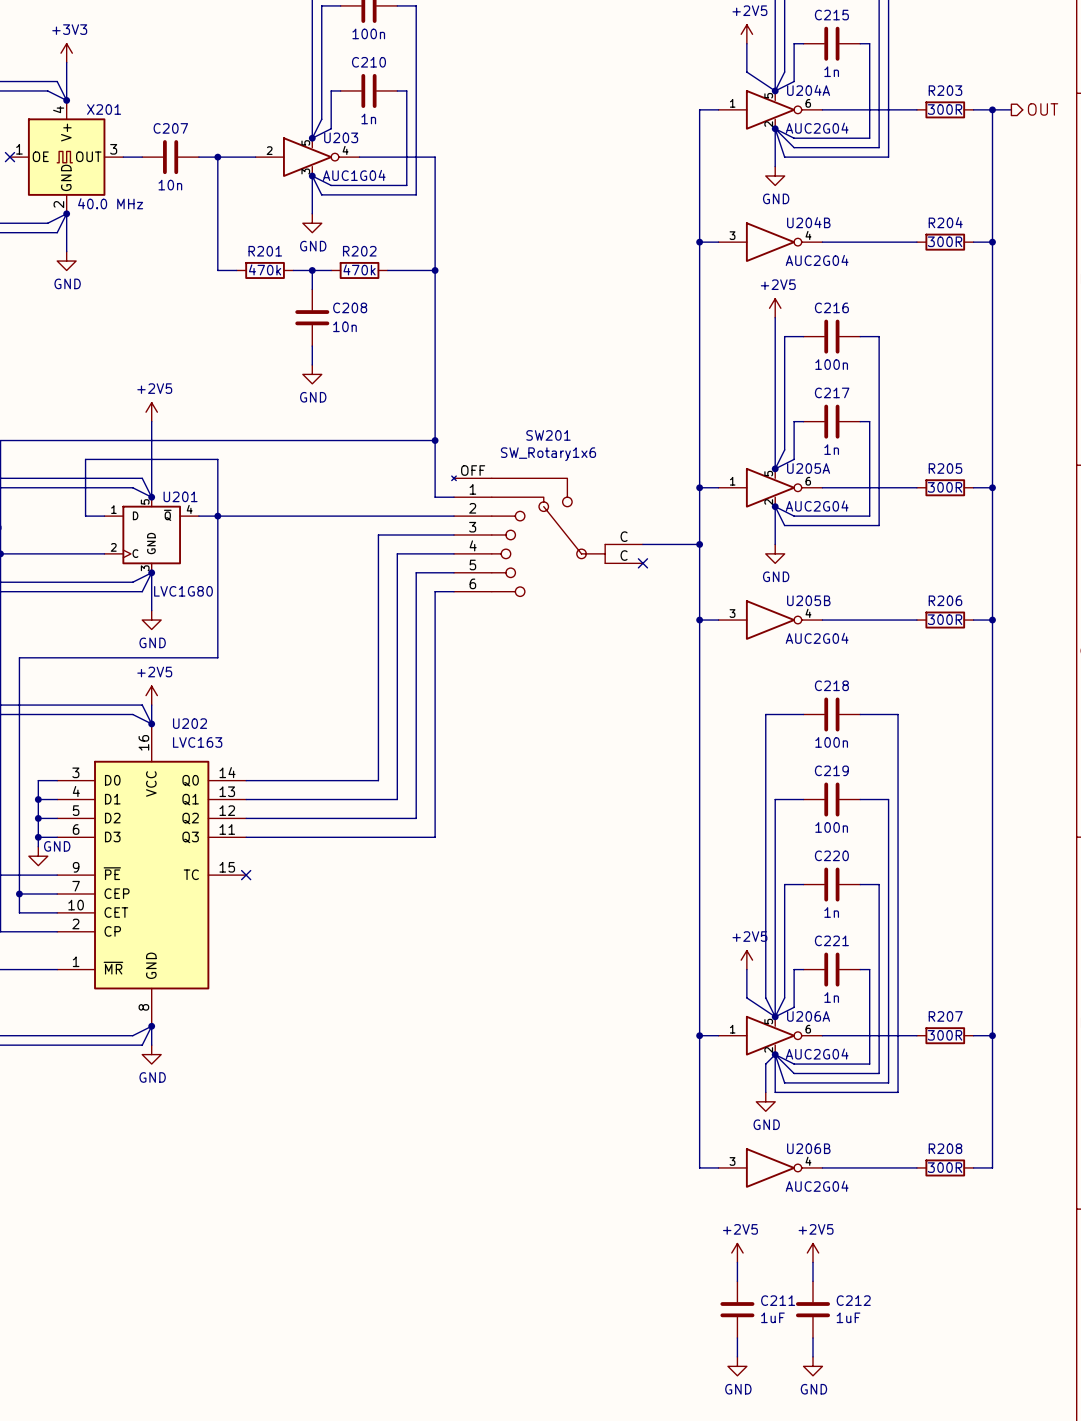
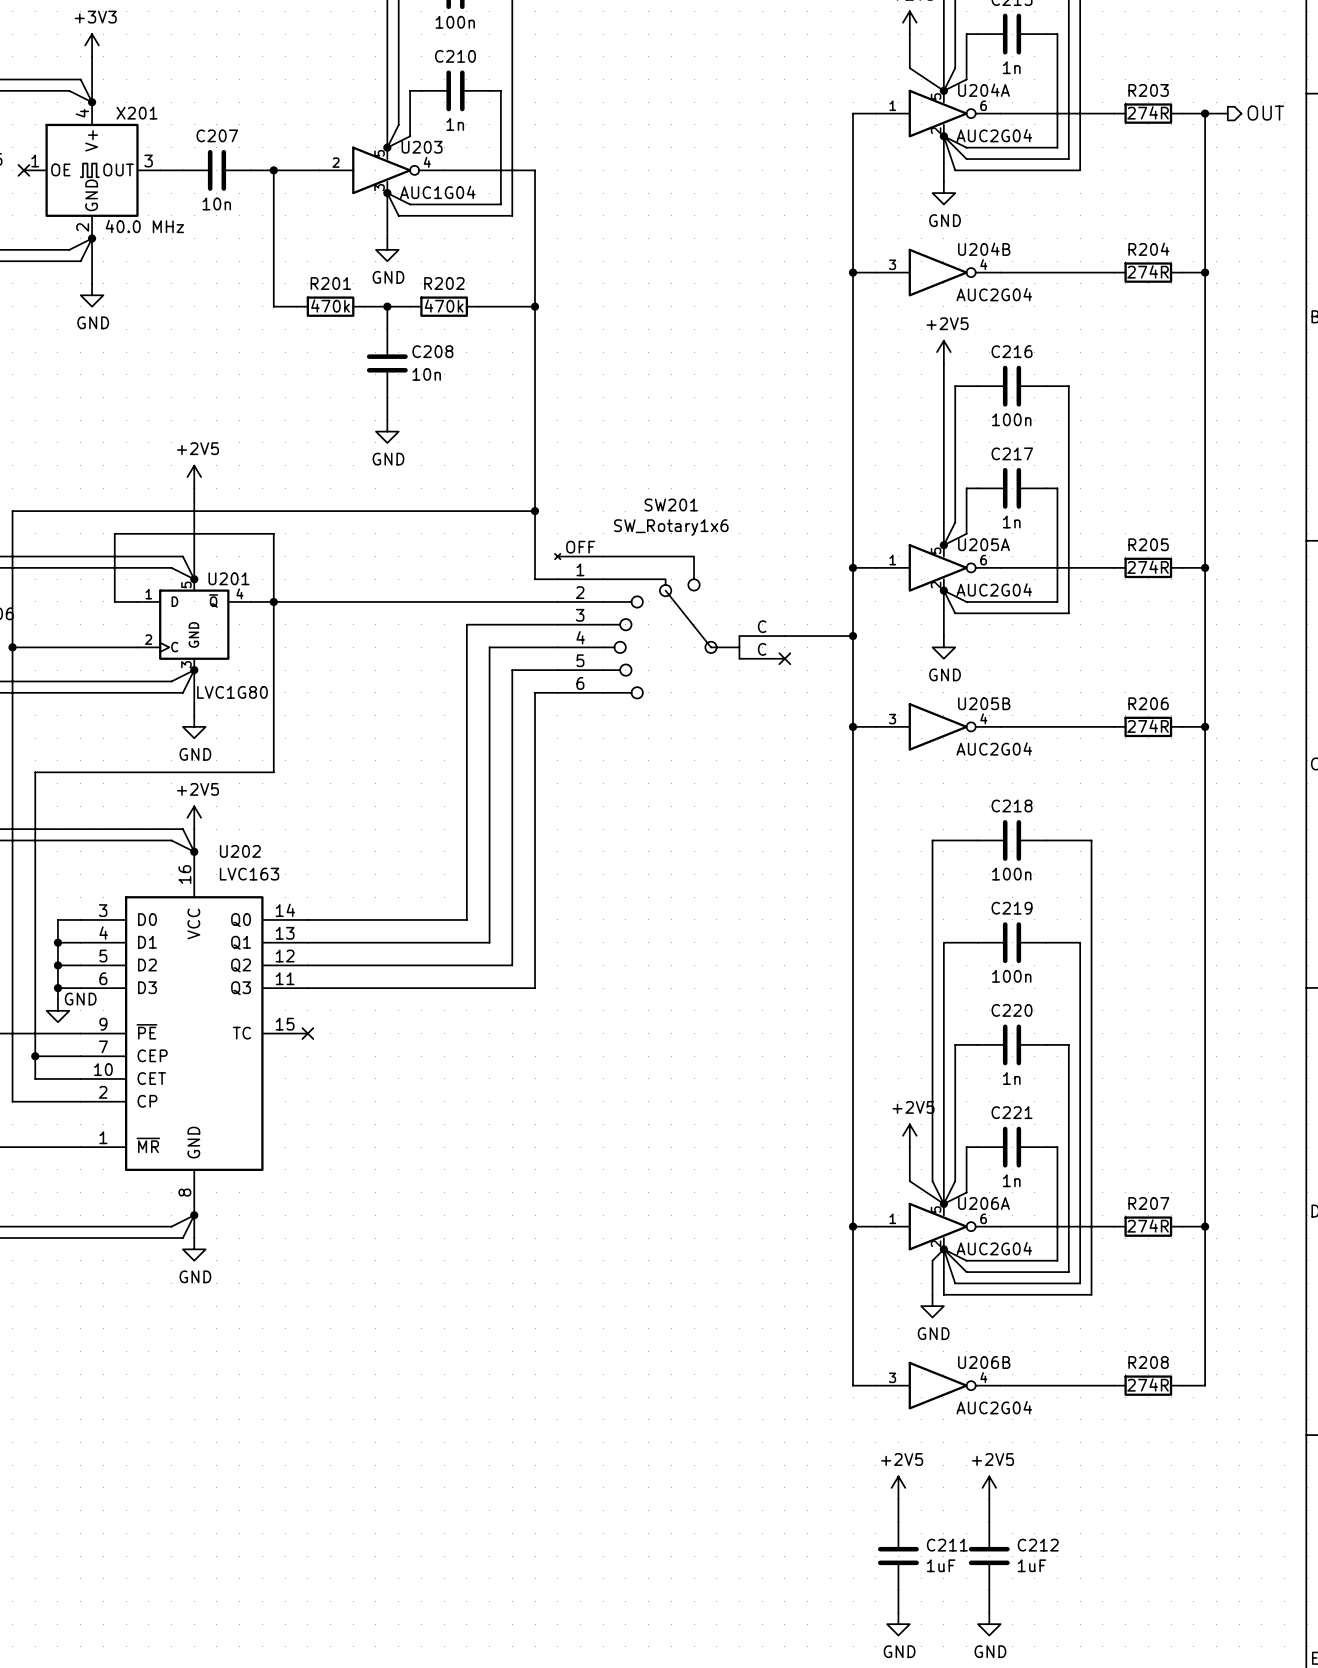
R203 value: 300R (945, 109) -> 274R (1148, 112)
R204 value: 300R (945, 241) -> 274R (1148, 271)
R205 value: 300R (945, 487) -> 274R (1148, 567)
R206 value: 300R (945, 619) -> 274R (1148, 726)
R207 value: 300R (945, 1035) -> 274R (1148, 1225)
R208 value: 300R (945, 1167) -> 274R (1148, 1384)

